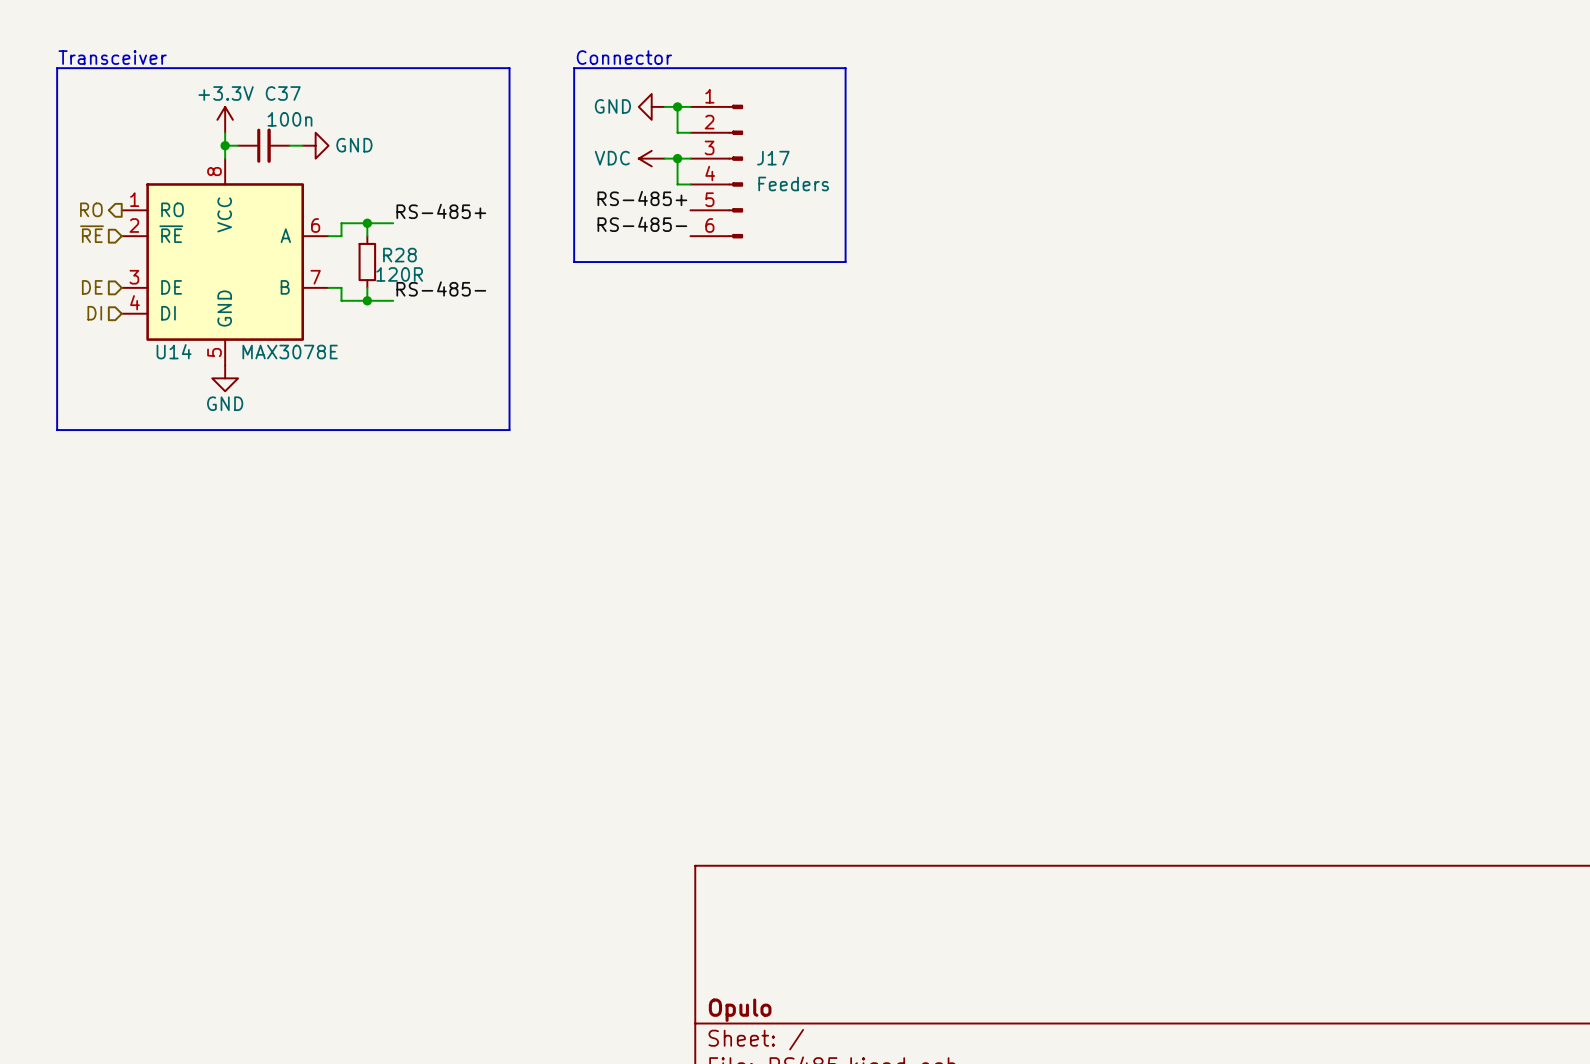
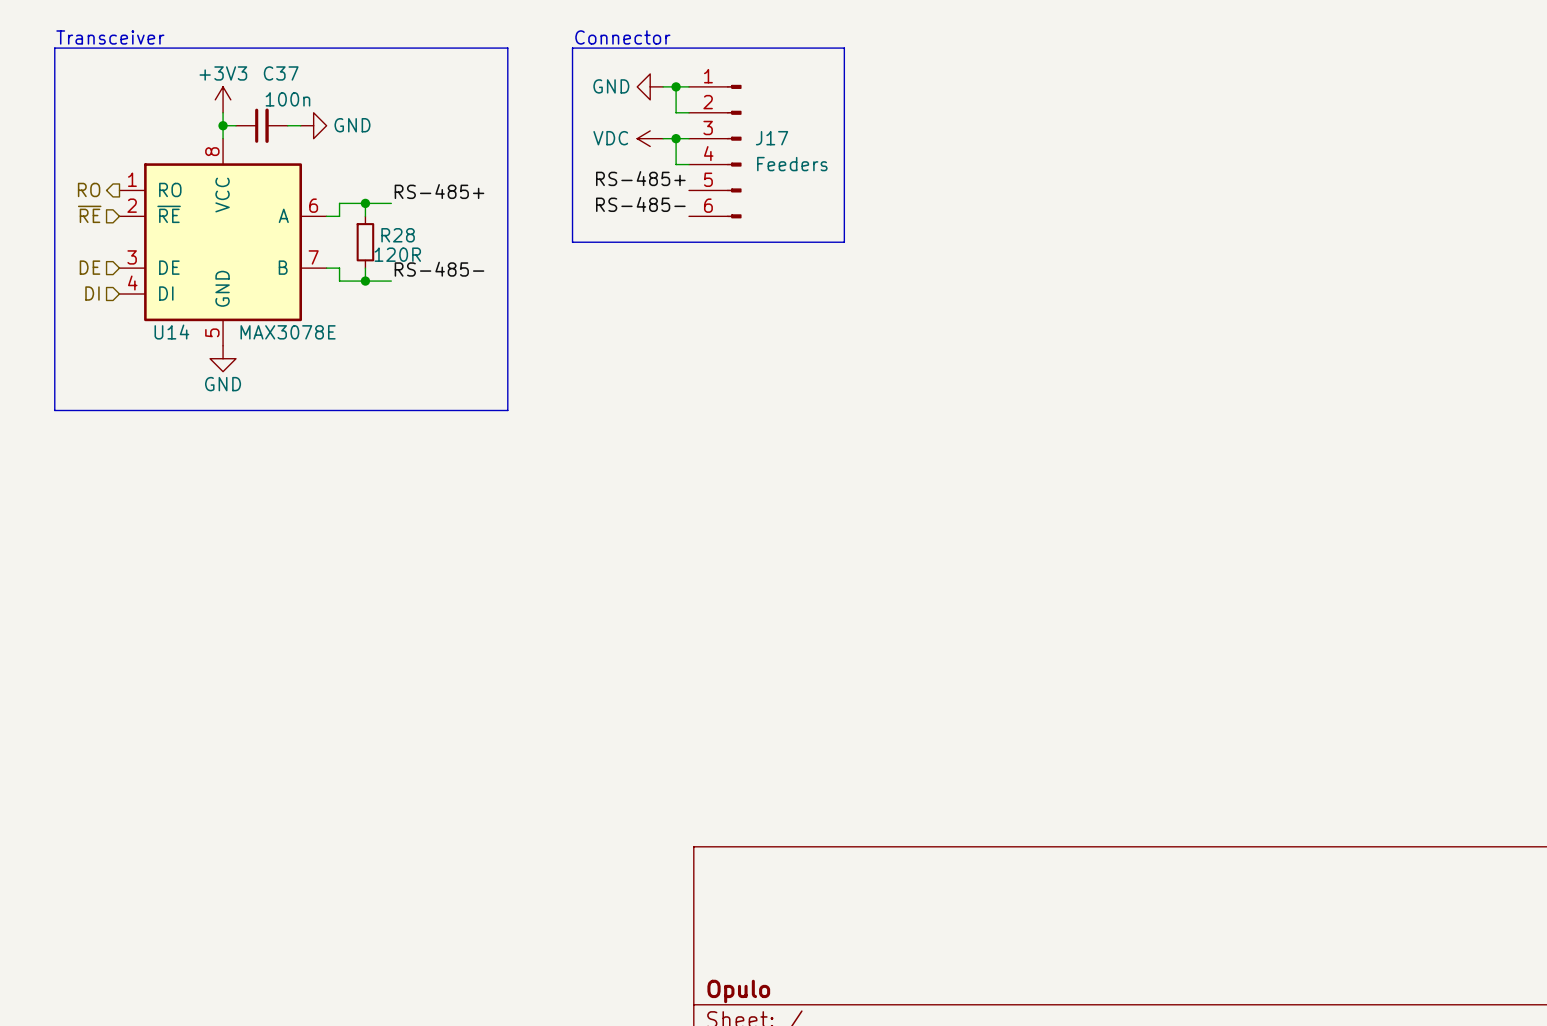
power symbol: +3.3V (225, 119) -> +3V3 (223, 99)

